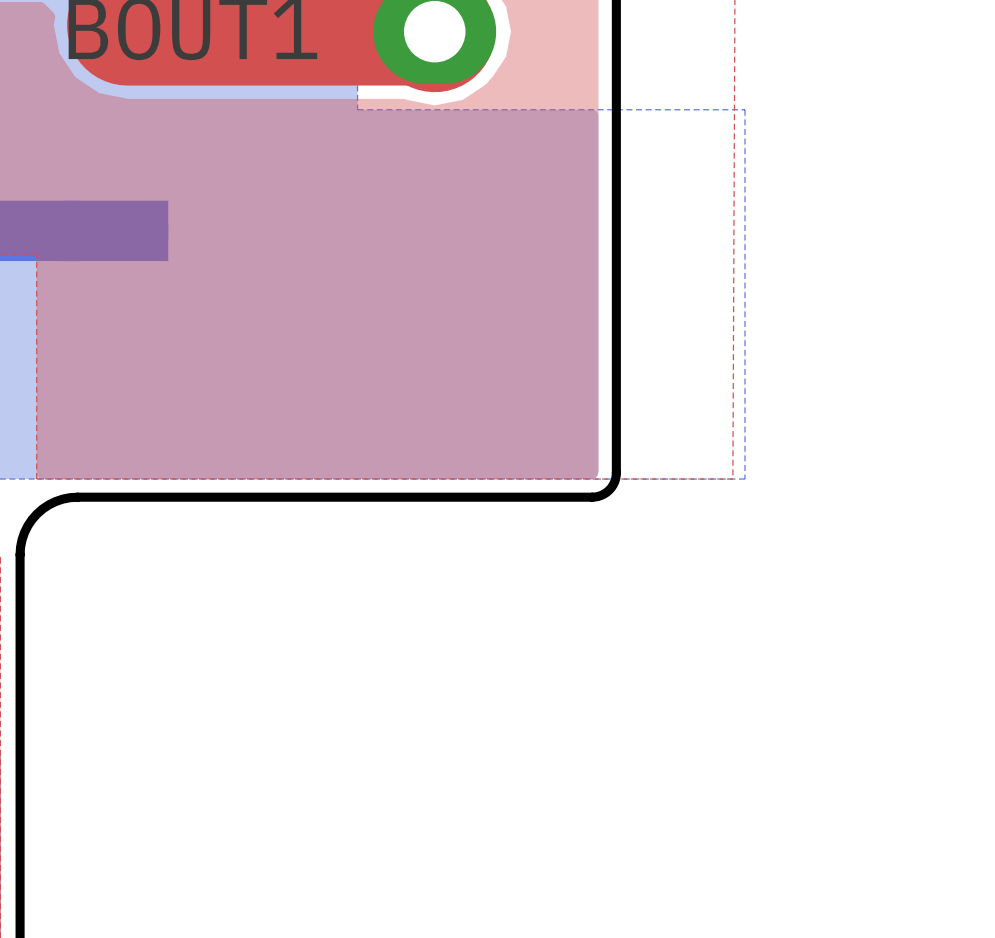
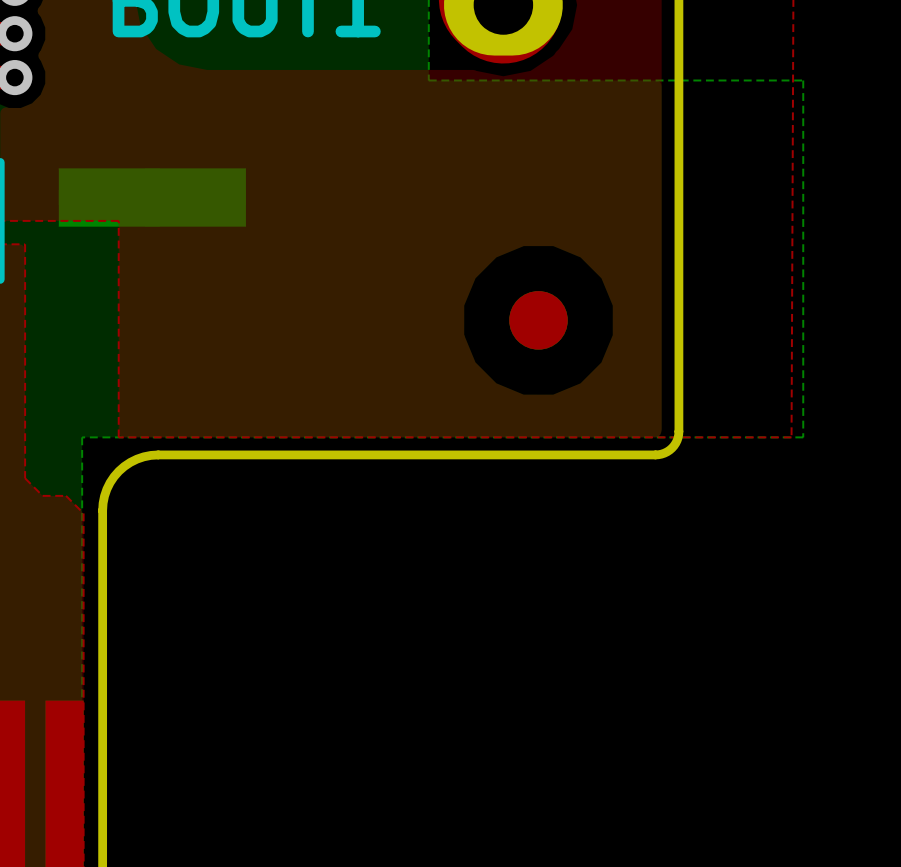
part: none -> (538, 320)

